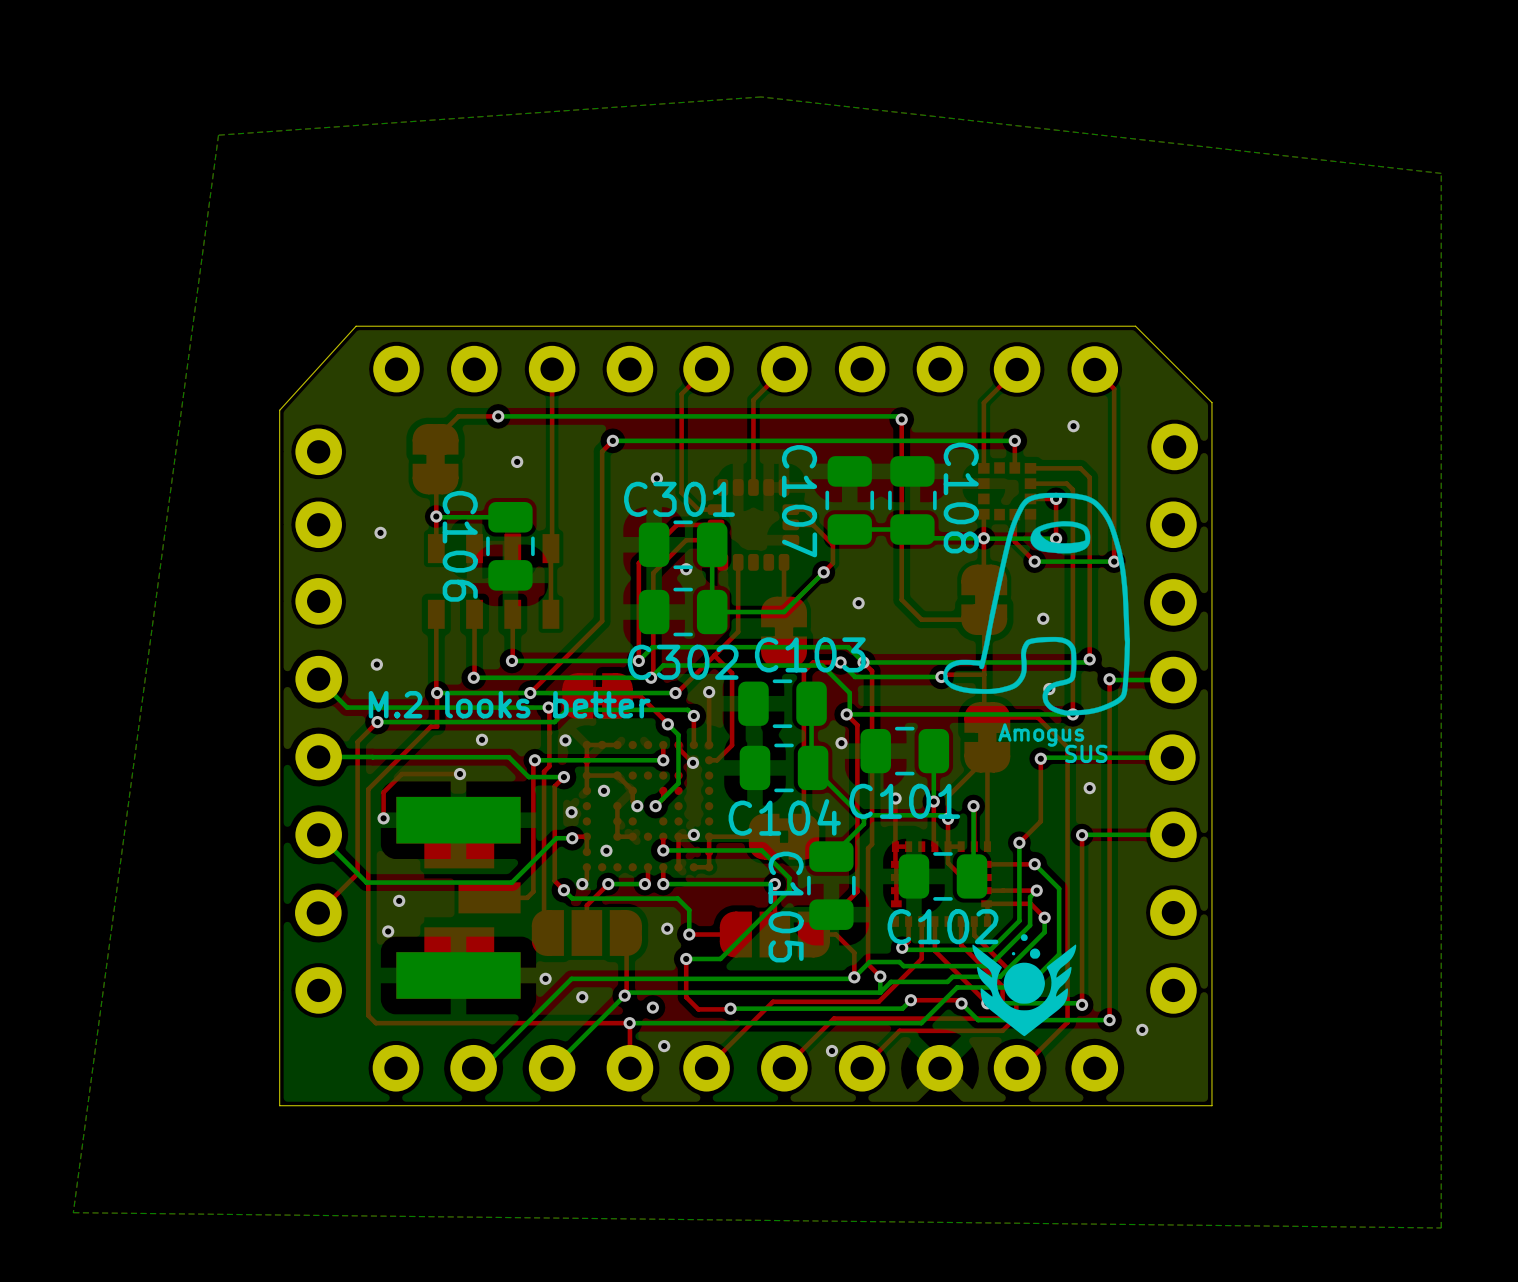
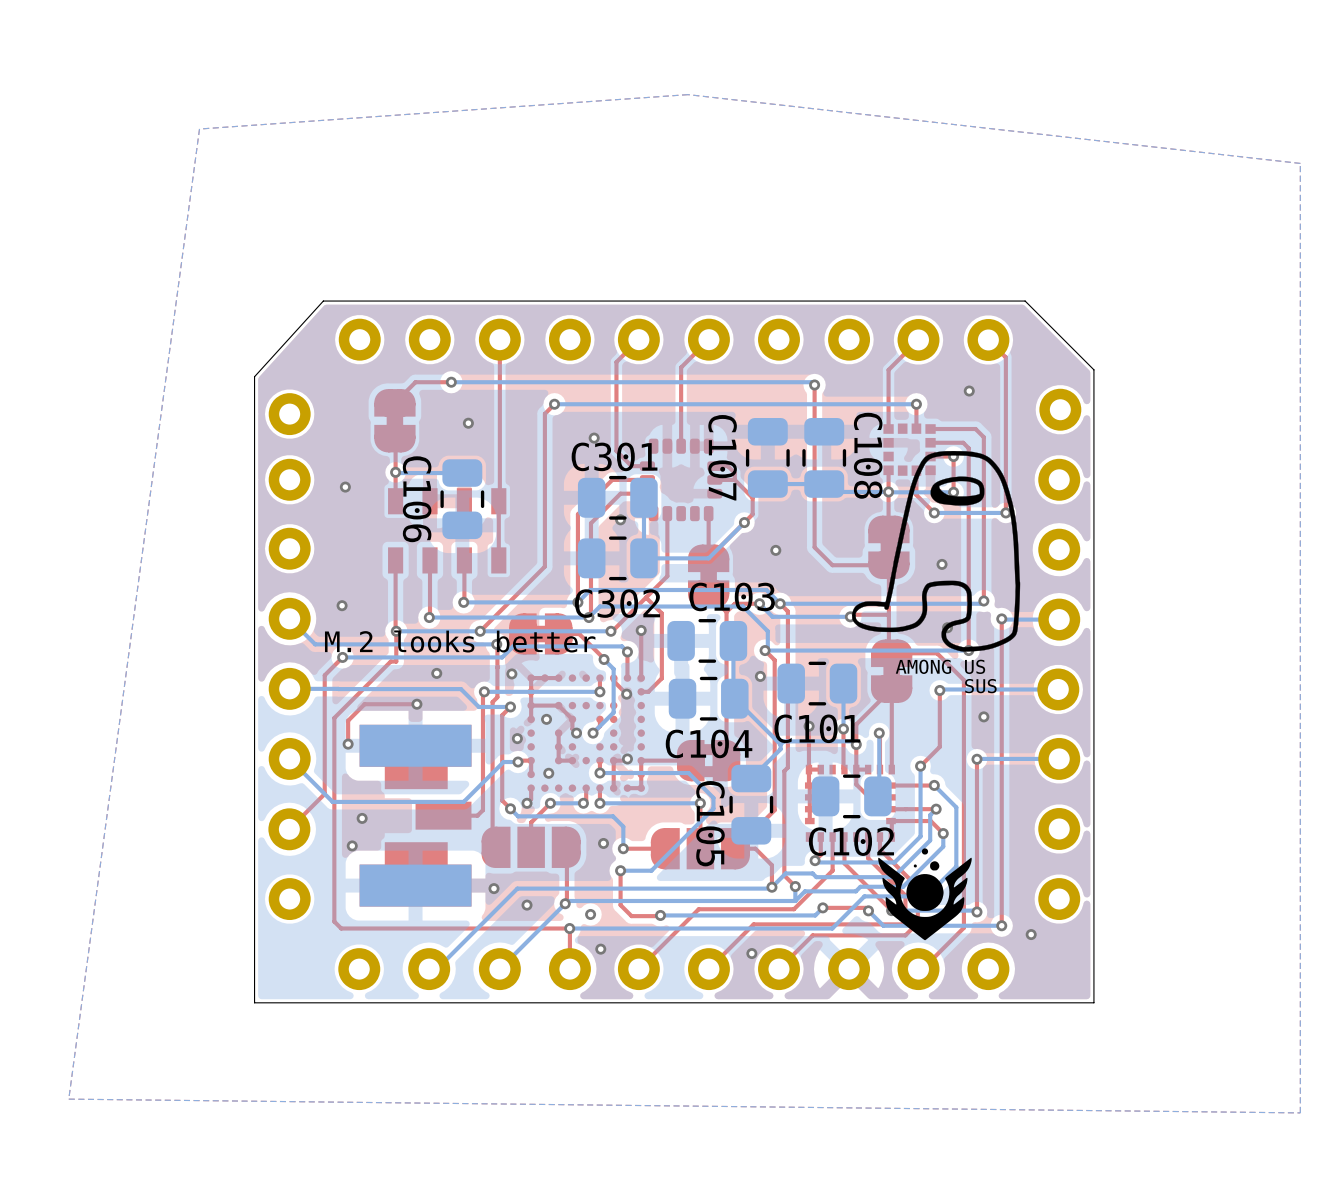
text: Amogus (1041, 735) -> AMONG US (940, 666)

